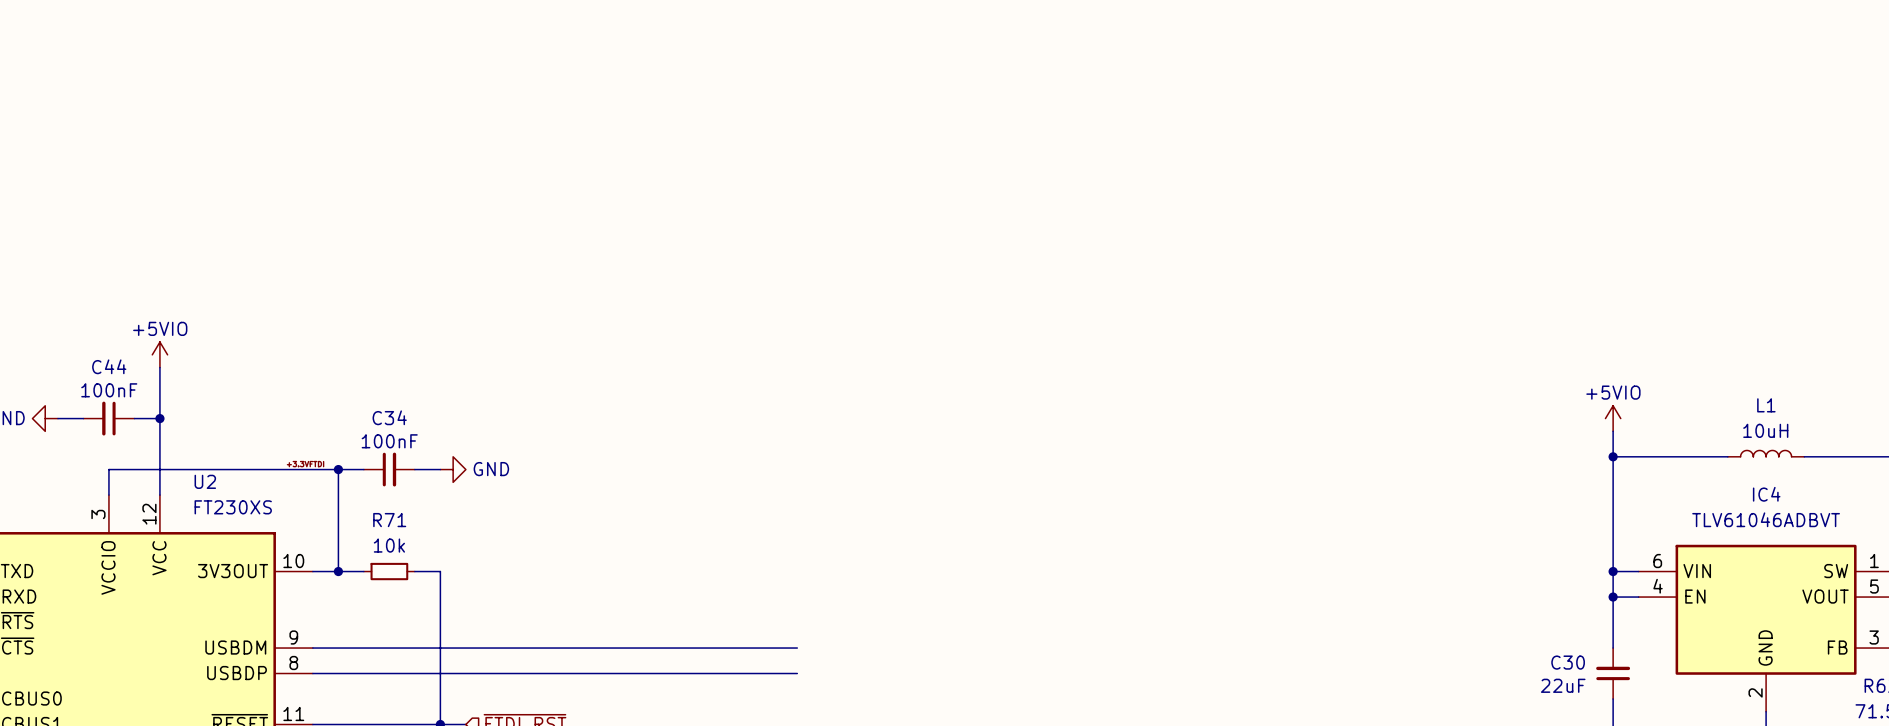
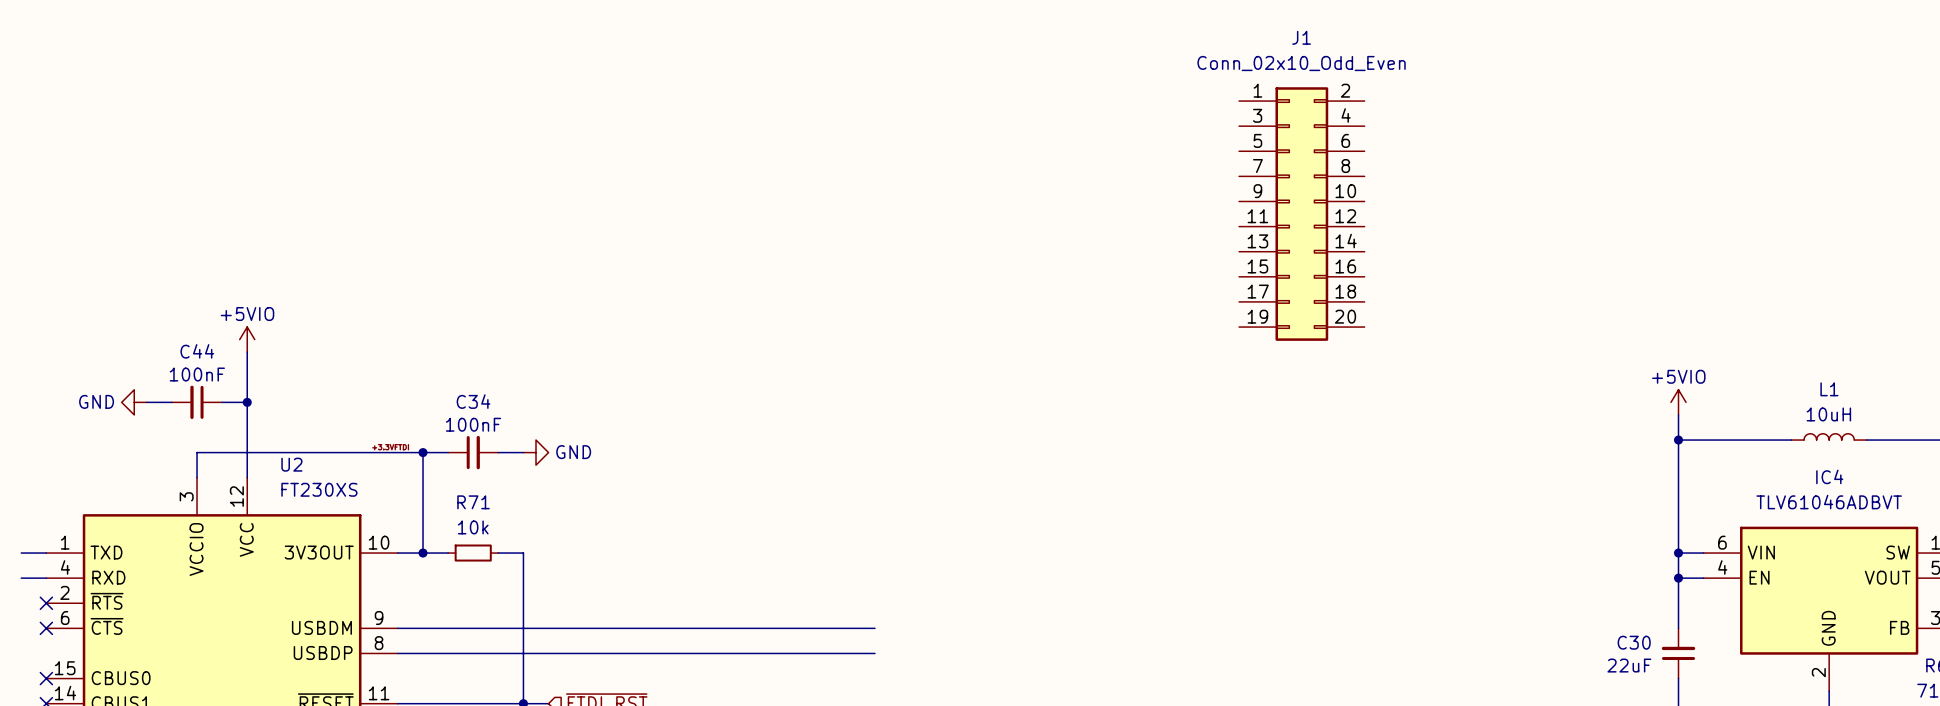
J1: none -> Conn_02x10_Odd_Even (1301, 214)

